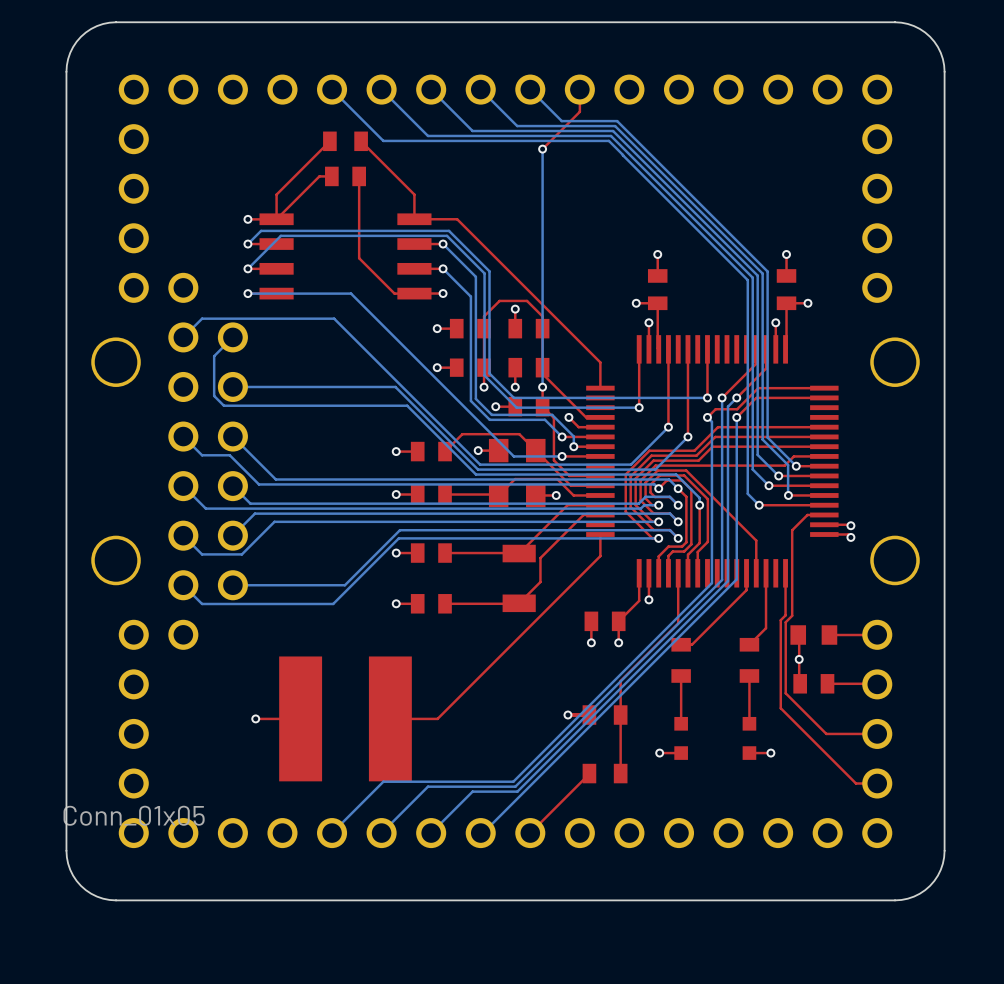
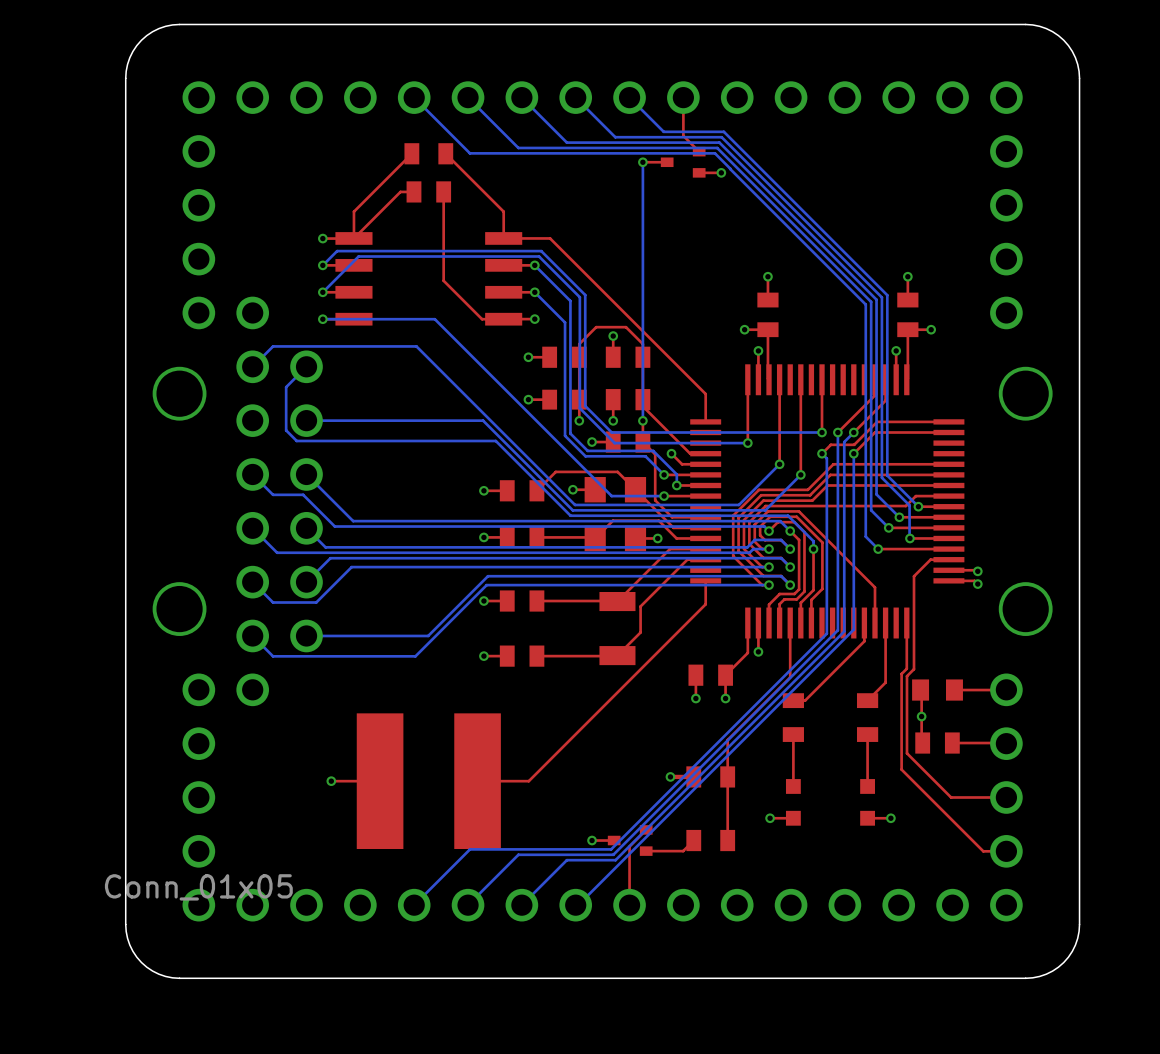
top track: (579, 111) (542, 149) -> (667, 162) (642, 162)
top track: none -> (683, 121) (683, 135) (699, 151)
part: none -> (683, 162)
top track: none -> (721, 172) (699, 172)
via: none -> (721, 172)
via: none -> (592, 840)
top track: none -> (614, 840) (592, 840)
part: none -> (630, 840)
top track: (589, 773) (530, 833) -> (646, 829) (629, 846) (629, 905)
top track: none -> (693, 840) (683, 851) (646, 851)

